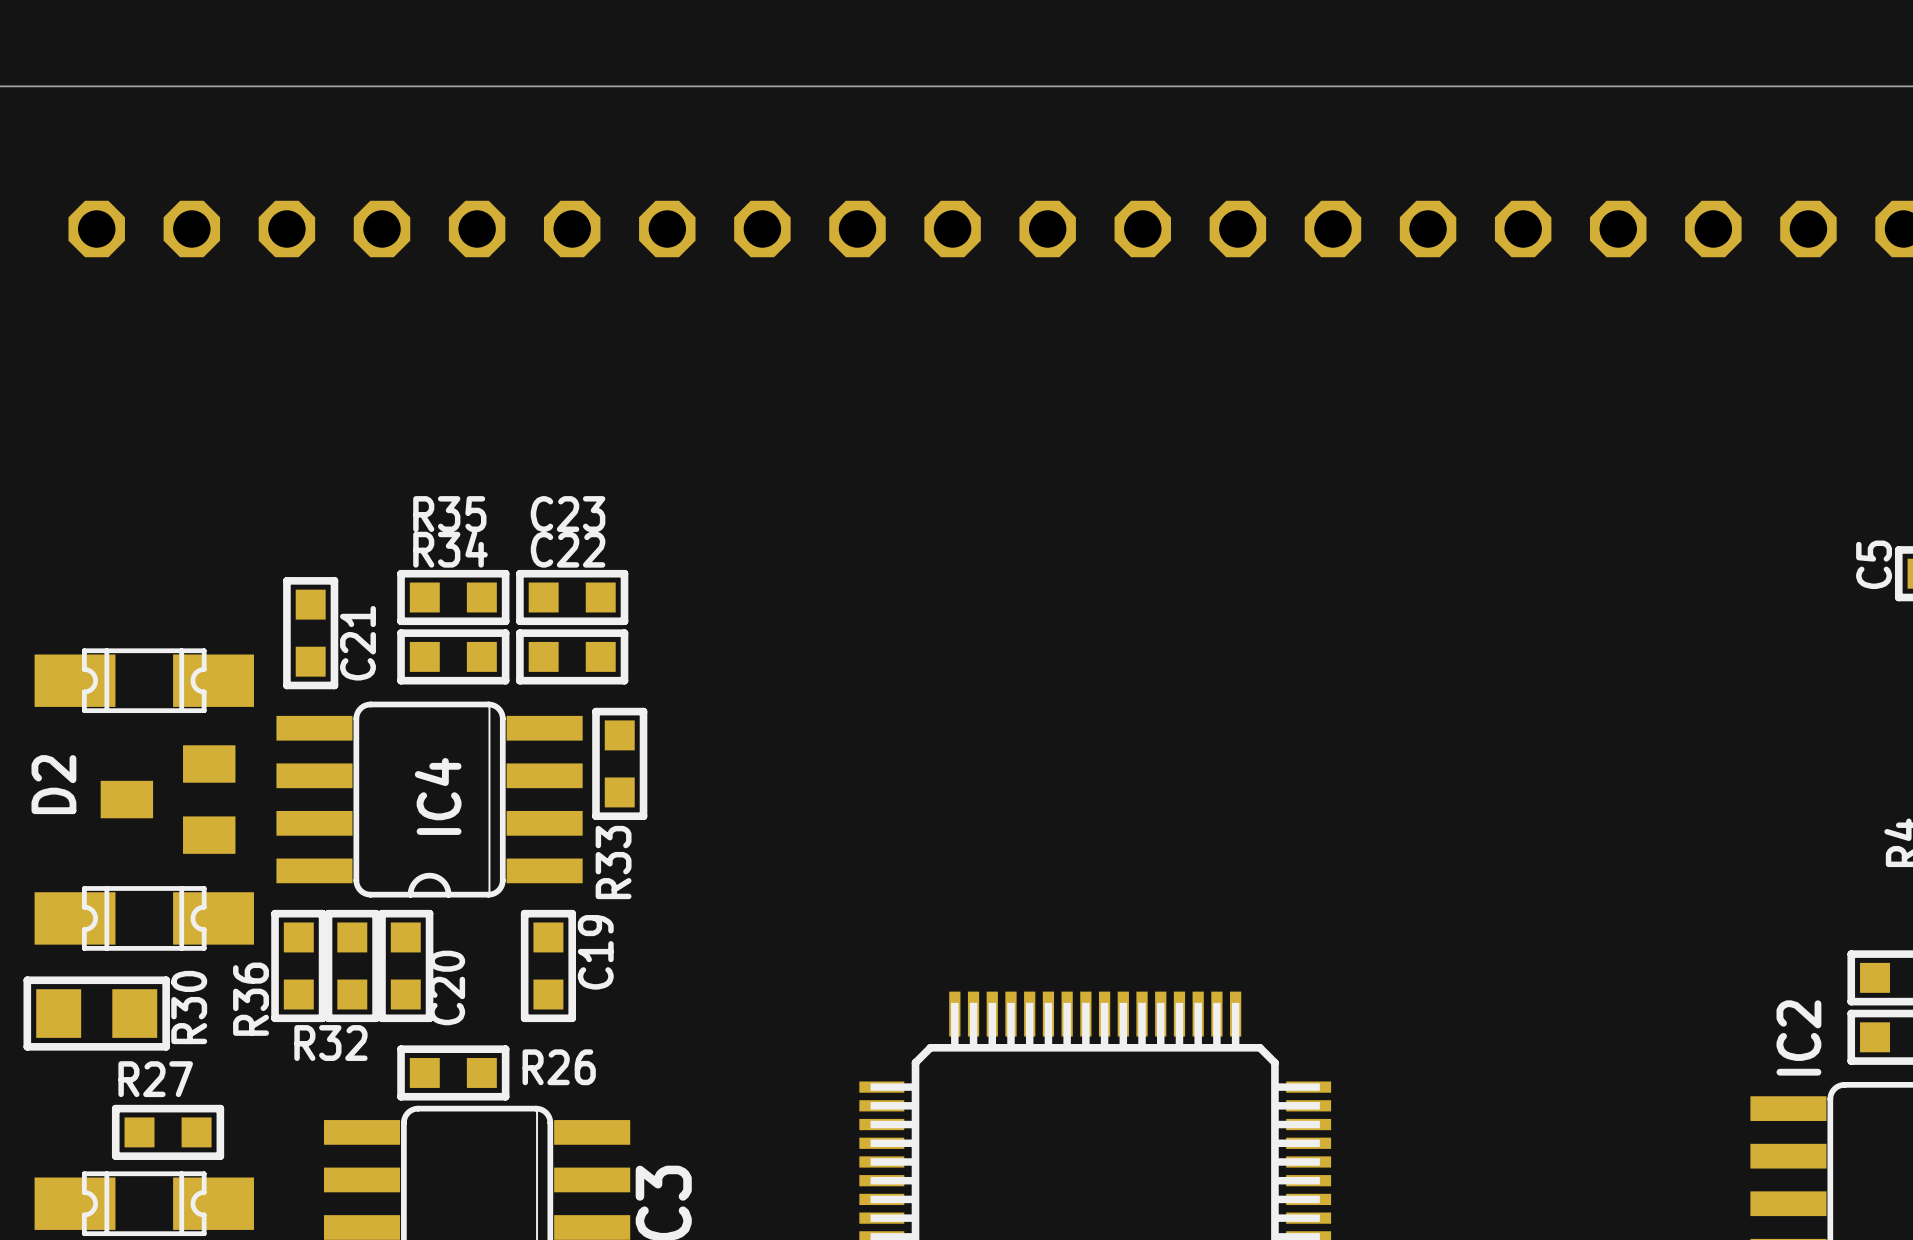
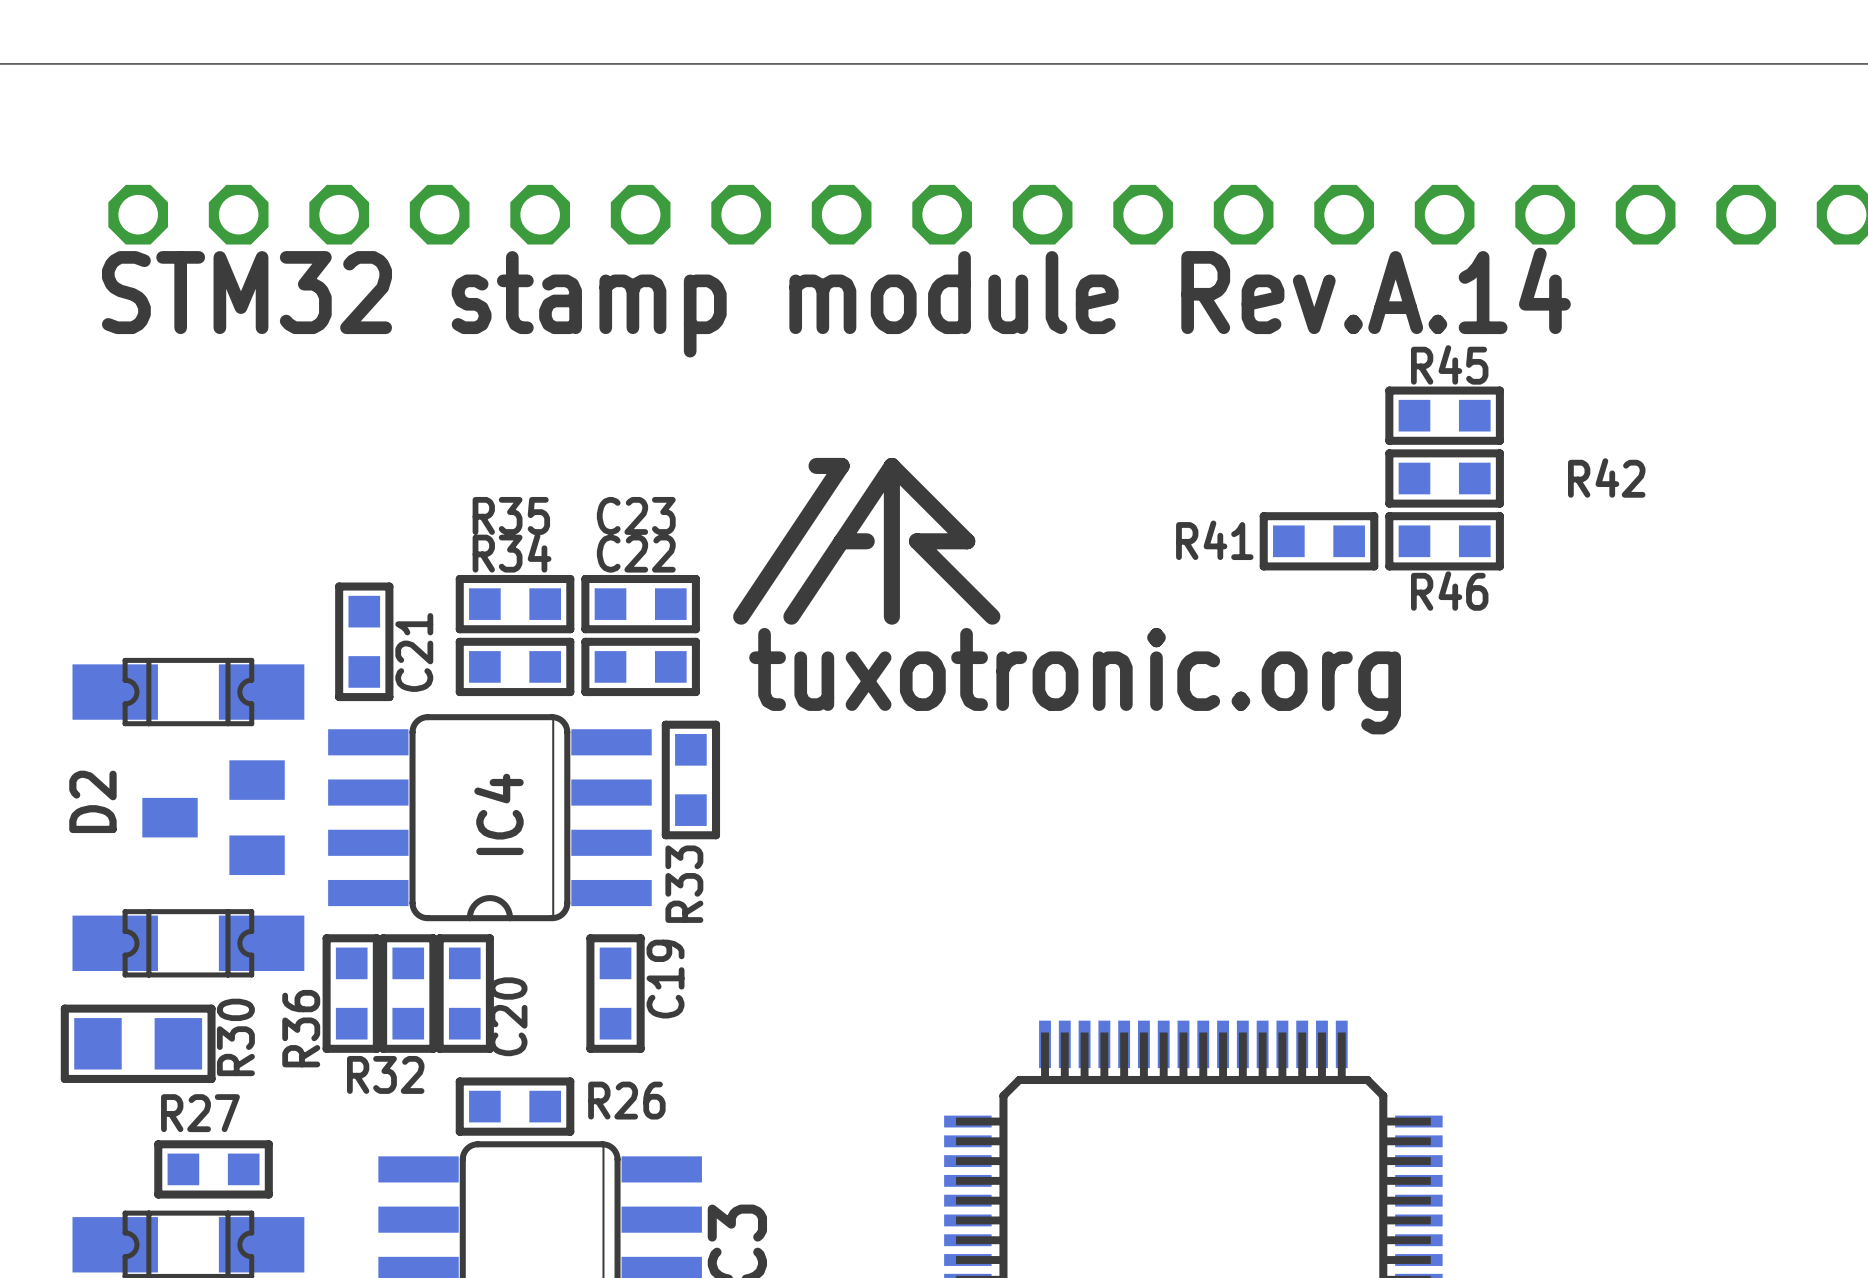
text: none -> STM32 stamp module Rev.A.14 (836, 302)
R45: none -> (1444, 415)
drawing: none -> [733, 457, 1001, 625]
R42: none -> (1444, 478)
R41: none -> (1319, 541)
R46: none -> (1444, 541)
text: none -> tuxotronic.org (1075, 681)

